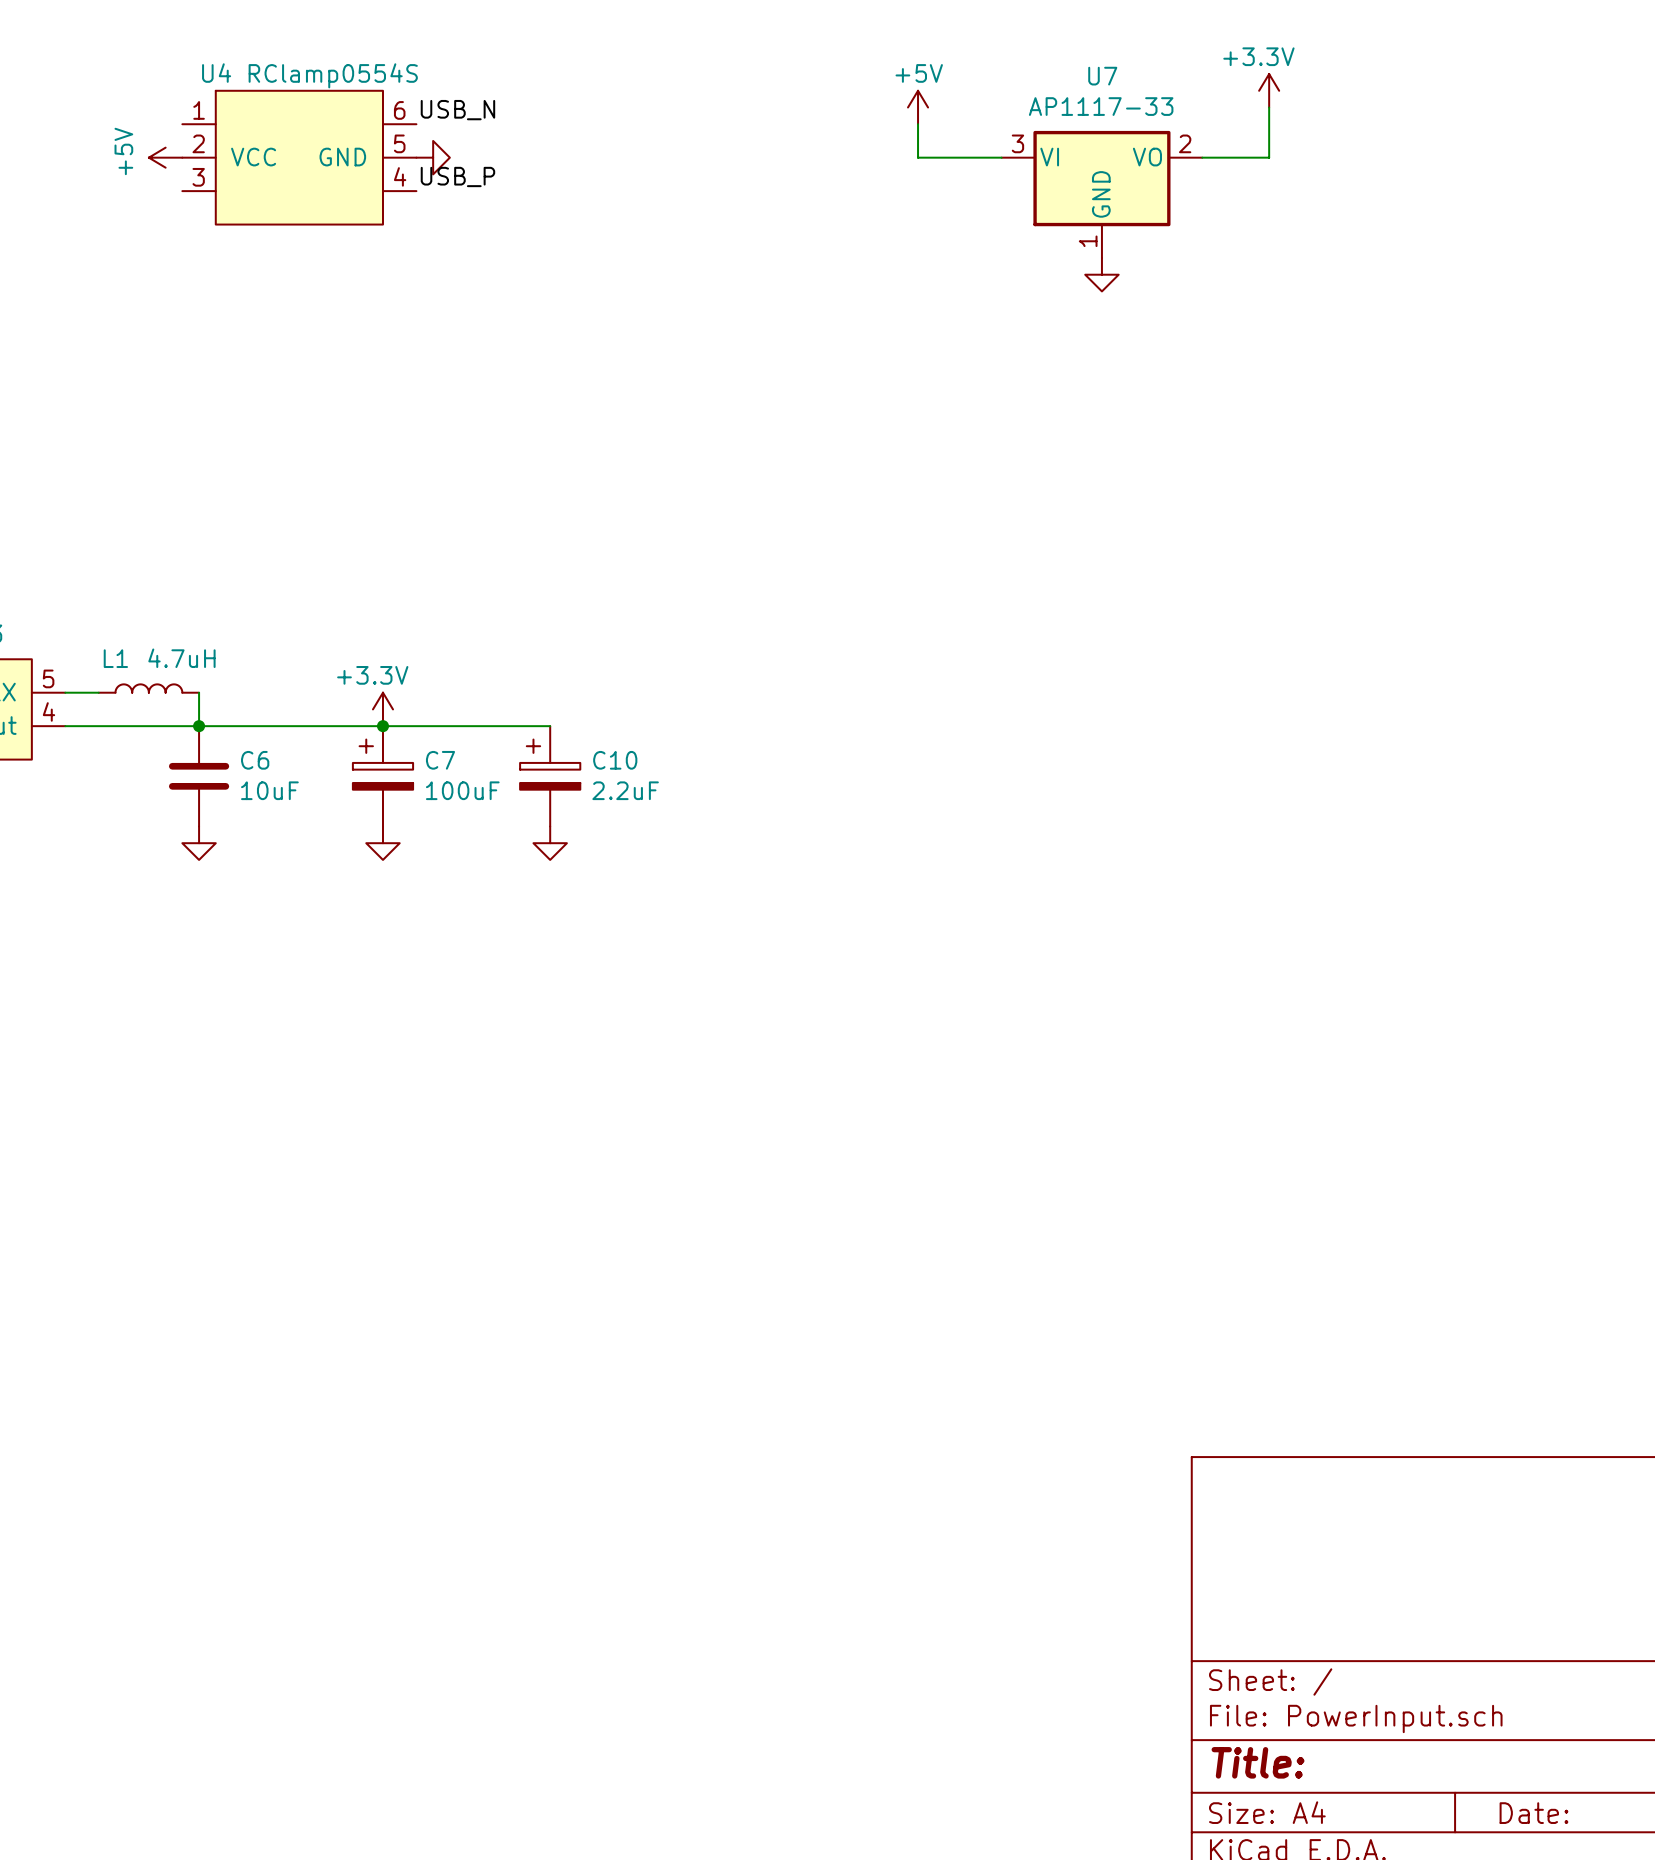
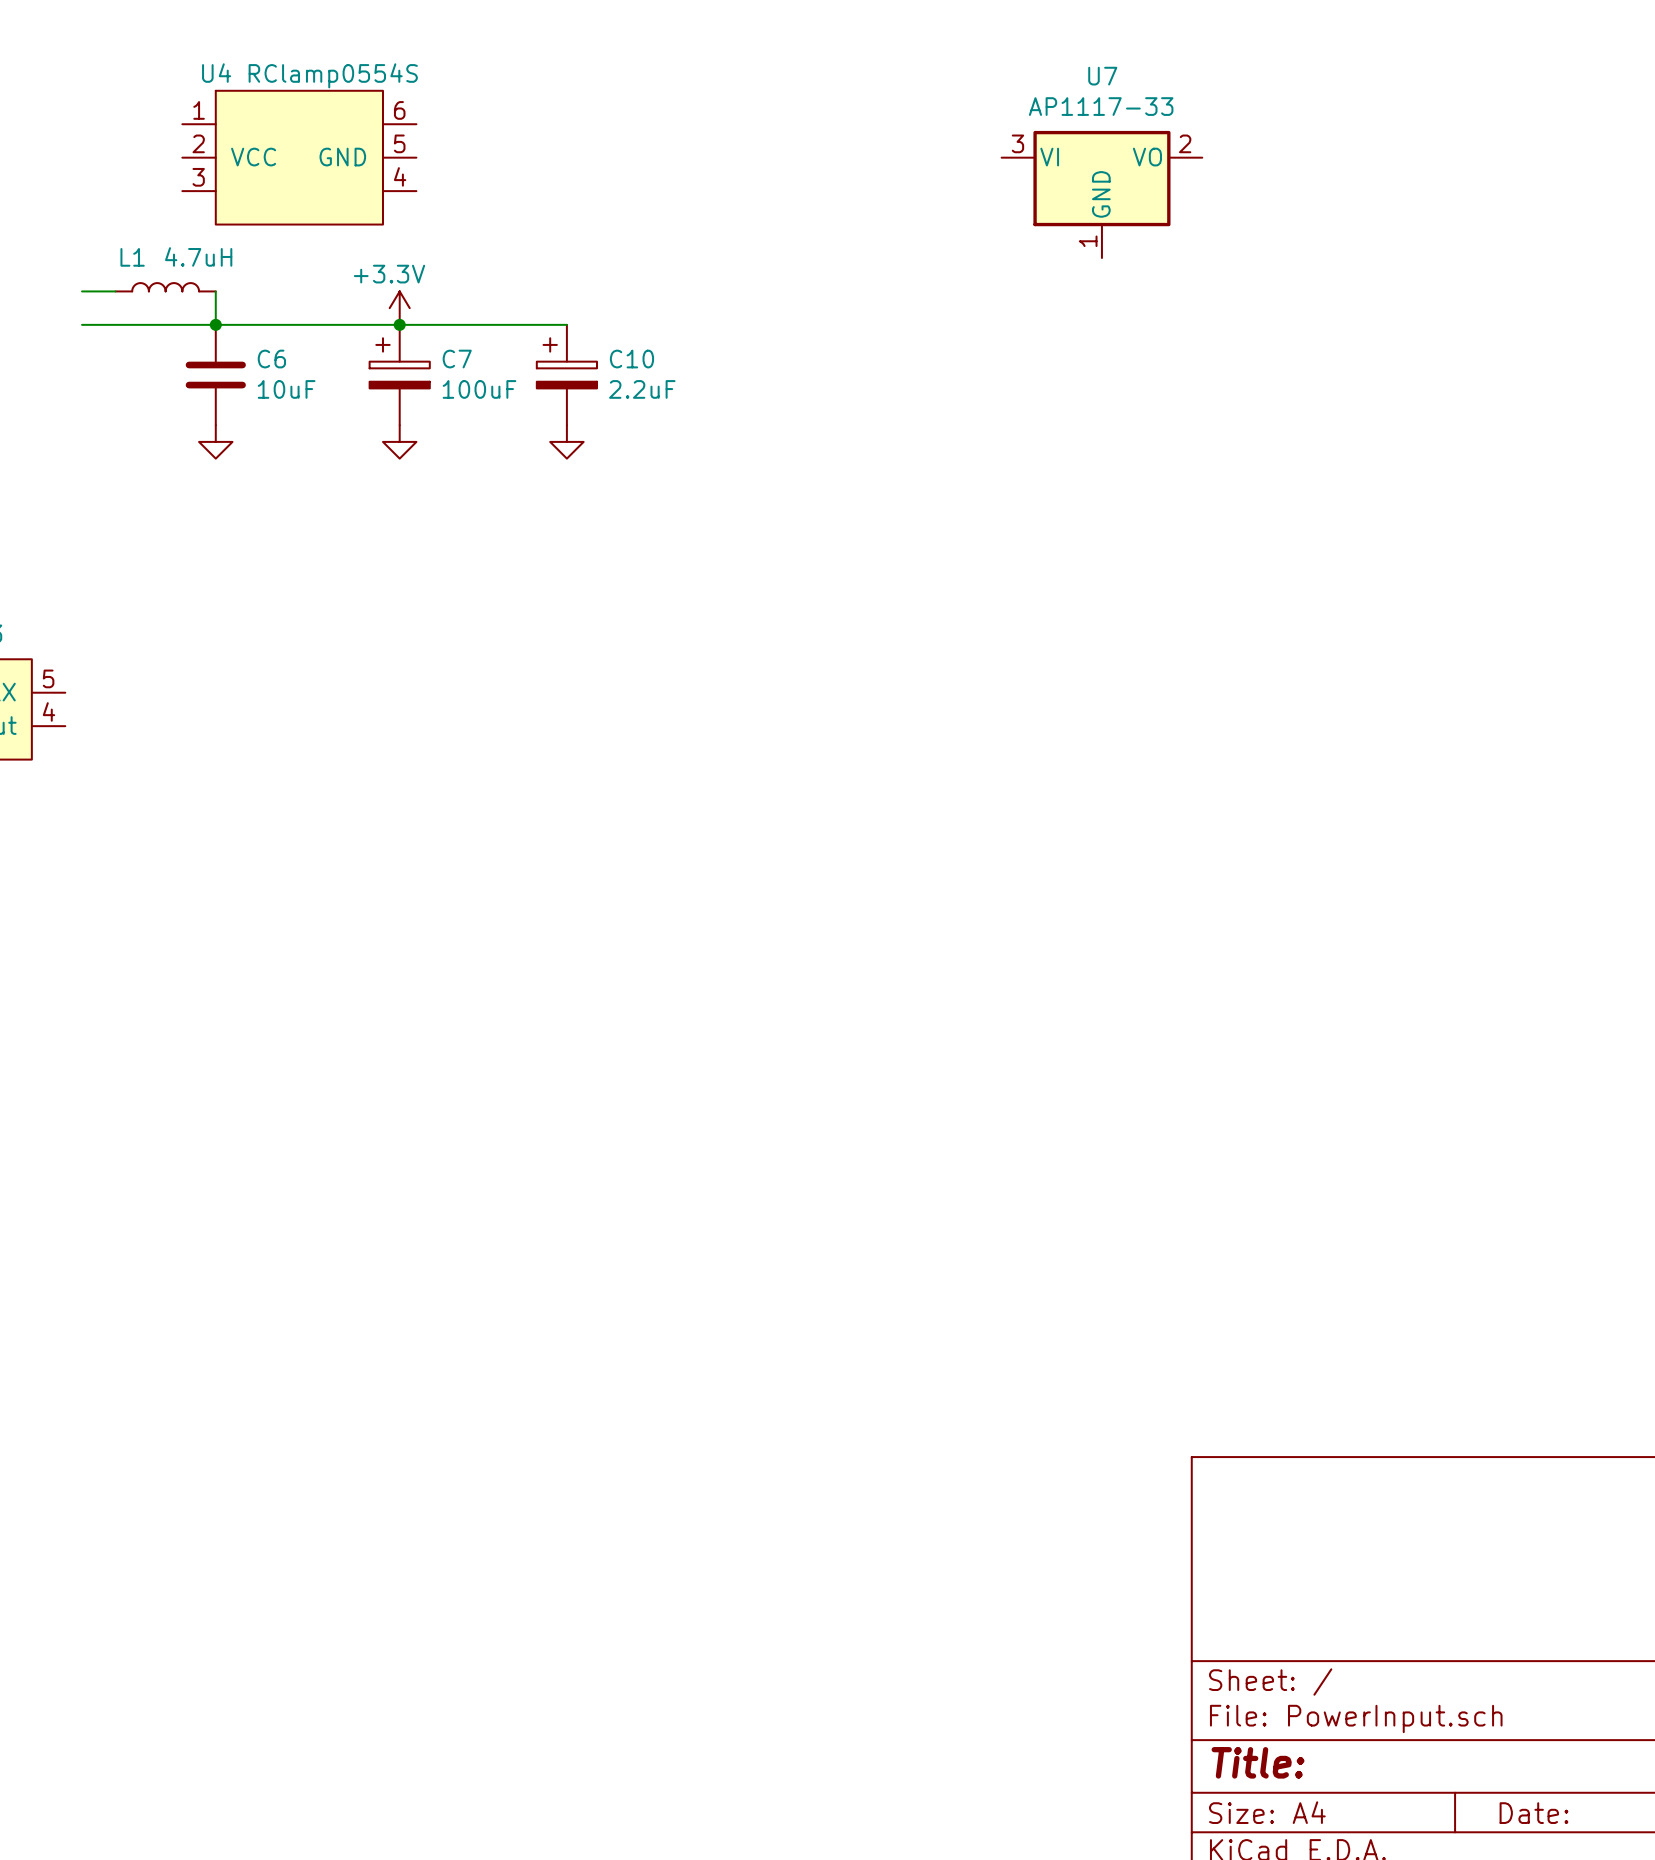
power symbol: +3.3V (1269, 90) -> none
power symbol: +5V (918, 107) -> none
wire: (1269, 107) (1269, 157) (1202, 157) -> none
label: USB_N (457, 110) -> none
wire: (918, 124) (918, 157) (1001, 157) -> none
power symbol: +5V (165, 157) -> none
power symbol: (433, 157) -> none
label: USB_P (457, 176) -> none
power symbol: (1101, 274) -> none
wire: none -> (82, 291) (115, 291)
wire: none -> (215, 291) (215, 324)
power symbol: none -> +3.3V (399, 308)
wire: none -> (82, 324) (566, 324)
junction: none -> (215, 324)
junction: none -> (399, 324)
power symbol: none -> (215, 441)
power symbol: none -> (399, 441)
power symbol: none -> (566, 441)
L1 position: (148, 688) -> (165, 287)
wire: (65, 692) (98, 692) -> none
wire: (199, 692) (199, 726) -> none
power symbol: +3.3V (382, 709) -> none
wire: (65, 726) (550, 726) -> none
junction: (199, 726) -> none
junction: (382, 726) -> none
C6 position: (199, 776) -> (215, 375)
C7 position: (382, 776) -> (399, 375)
C10 position: (550, 776) -> (566, 375)
power symbol: (199, 843) -> none
power symbol: (382, 843) -> none
power symbol: (550, 843) -> none

